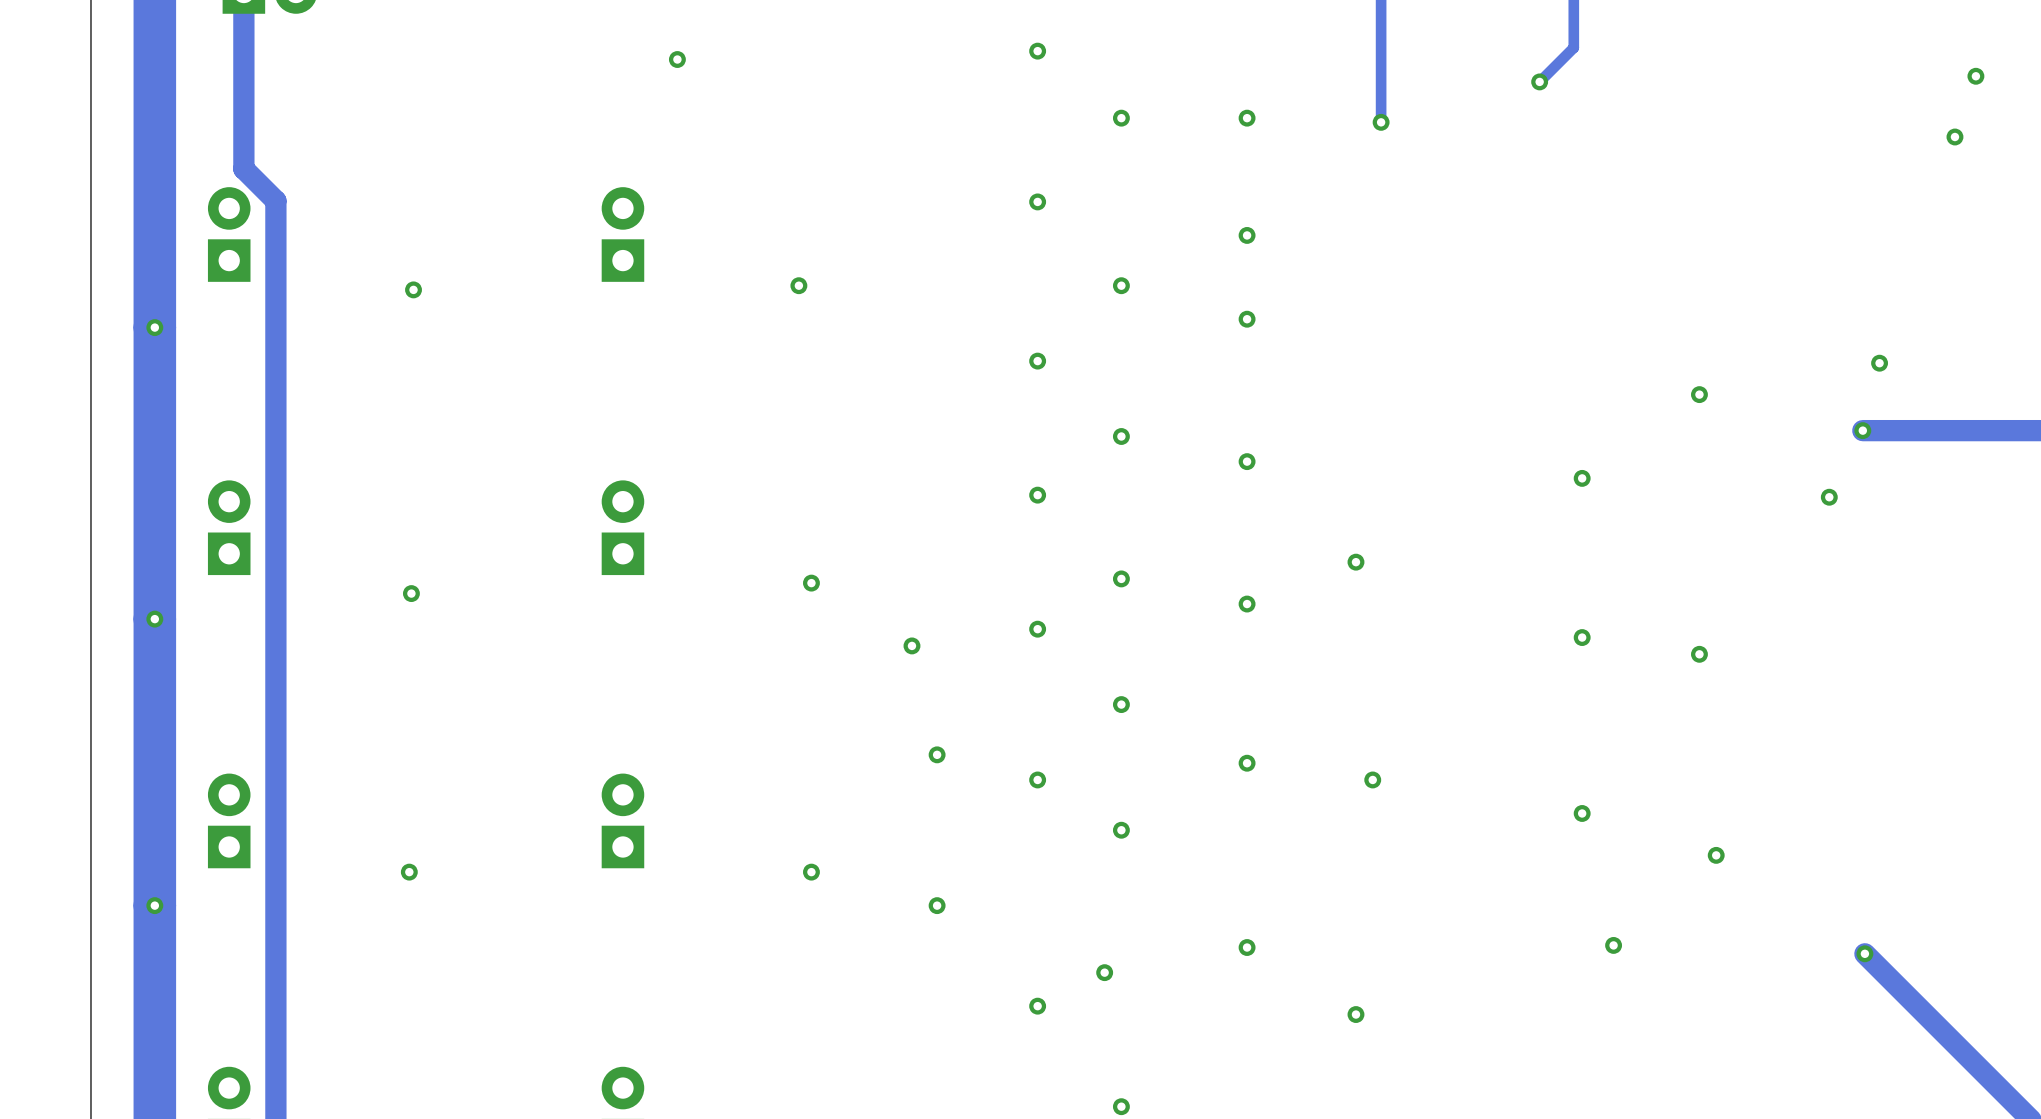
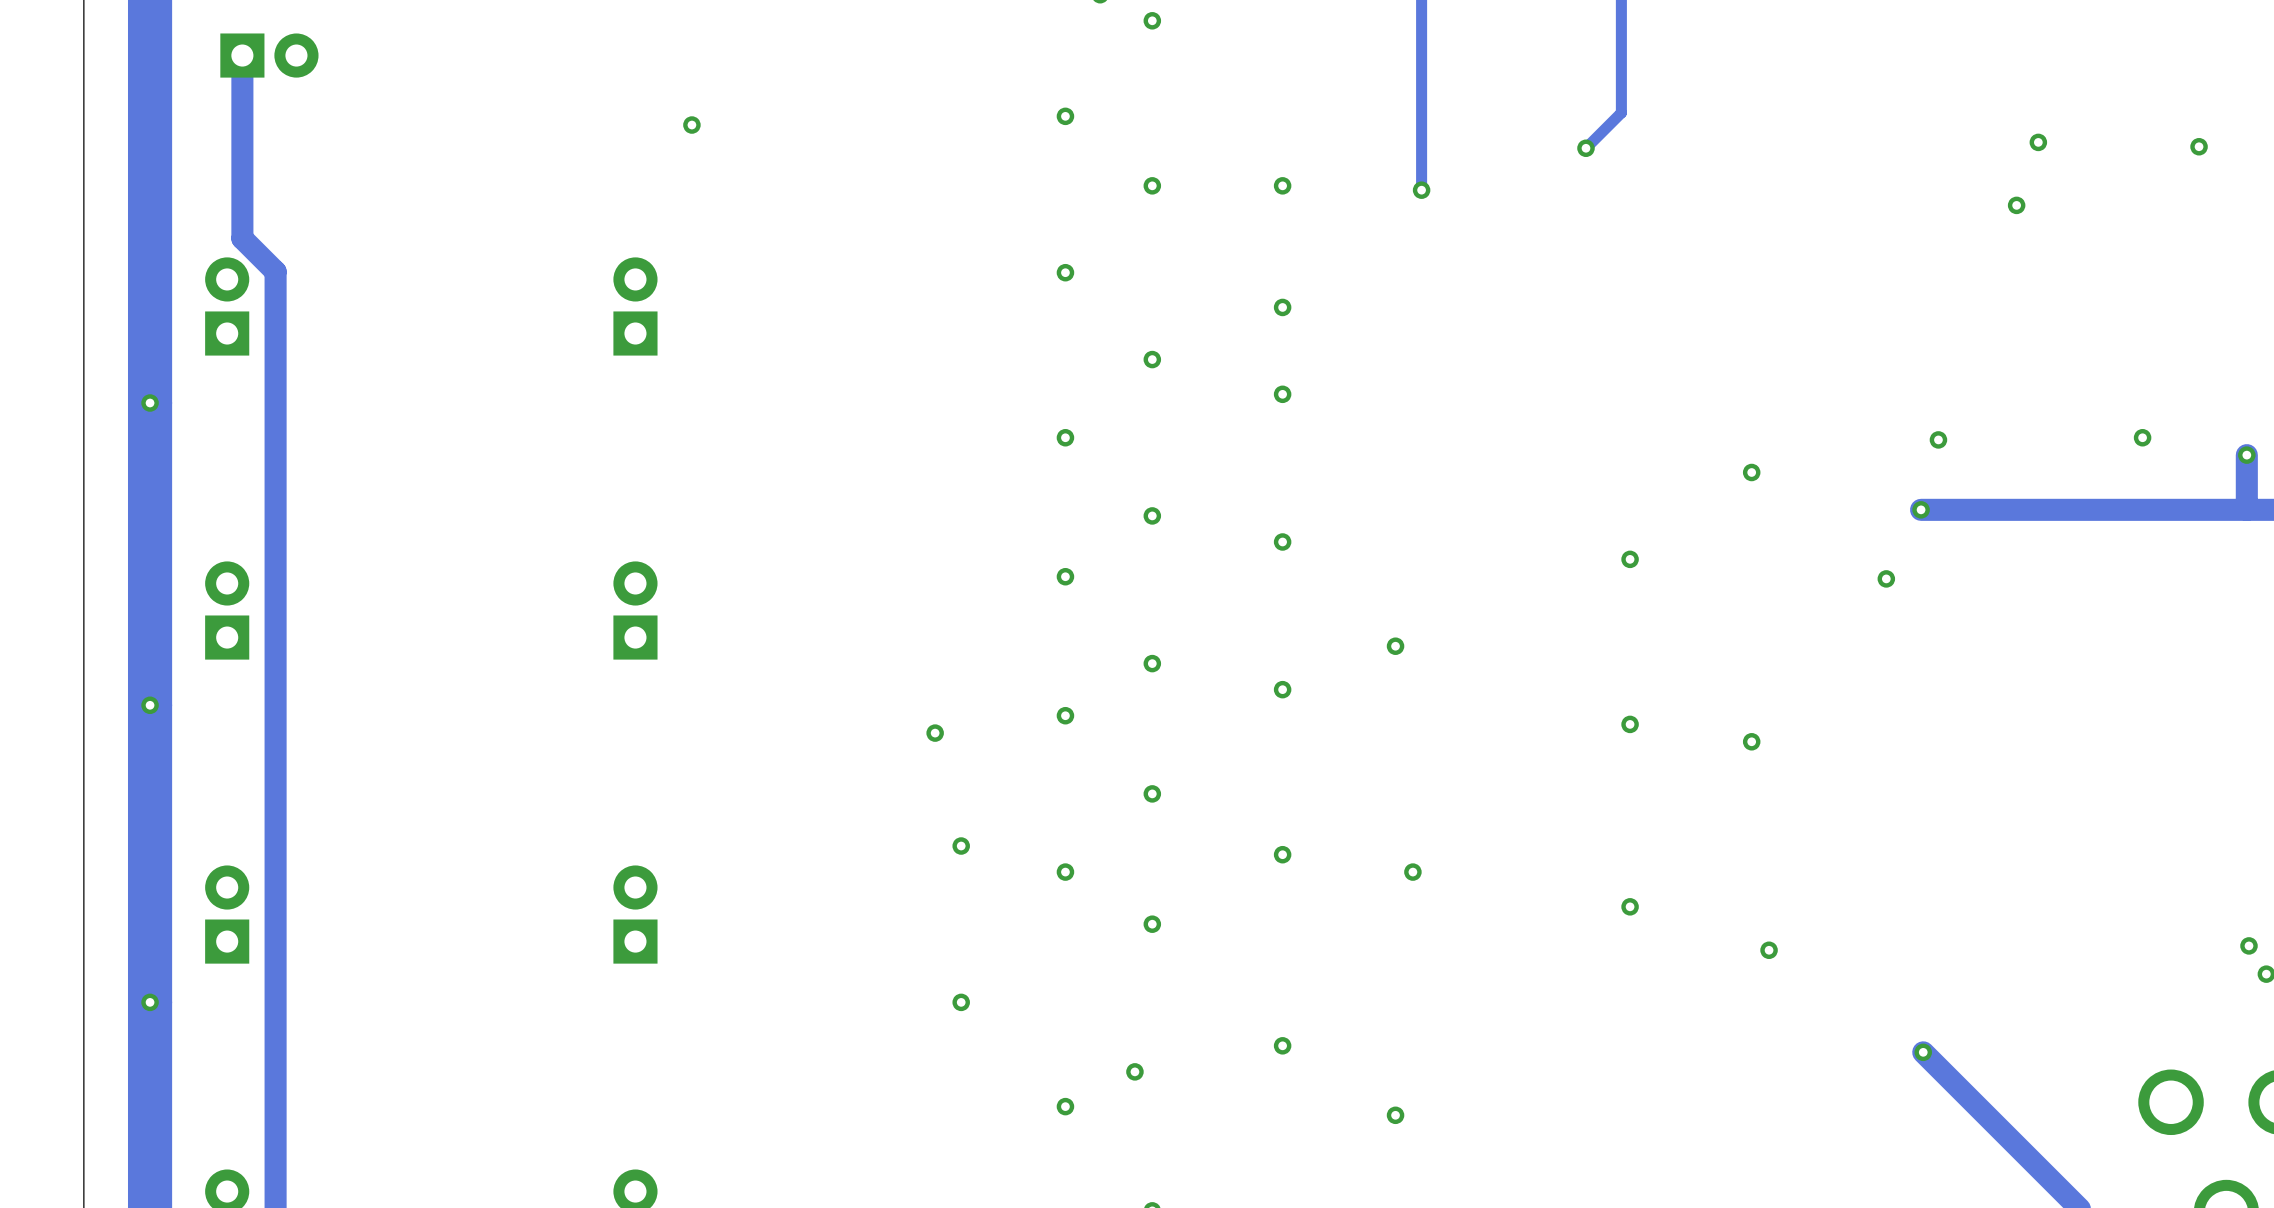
via: (798, 285) -> none
via: (413, 289) -> none
via: (811, 583) -> none
via: (411, 593) -> none
via: (409, 872) -> none
via: (811, 872) -> none
via: (1613, 945) -> none

